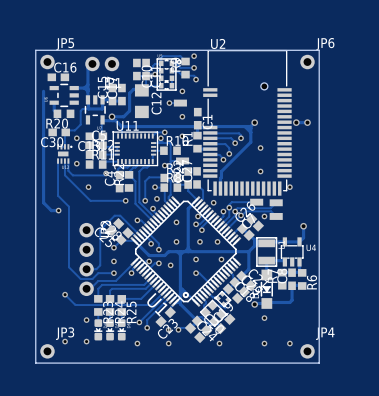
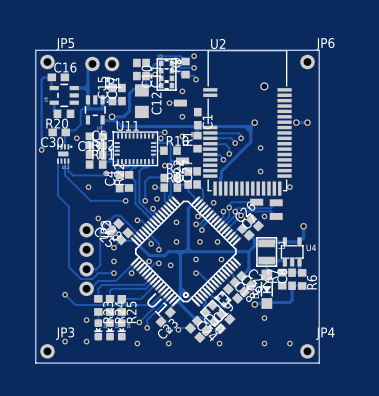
track: none -> (51, 77) (43, 77) (41, 79) (41, 149)
track: none -> (51, 77) (51, 85) (54, 88)
track: (43, 91) (43, 202) (51, 210) (58, 210) -> none
via: none -> (41, 149)
via: (76, 163) -> none
via: (58, 210) -> none
via: none -> (98, 218)

